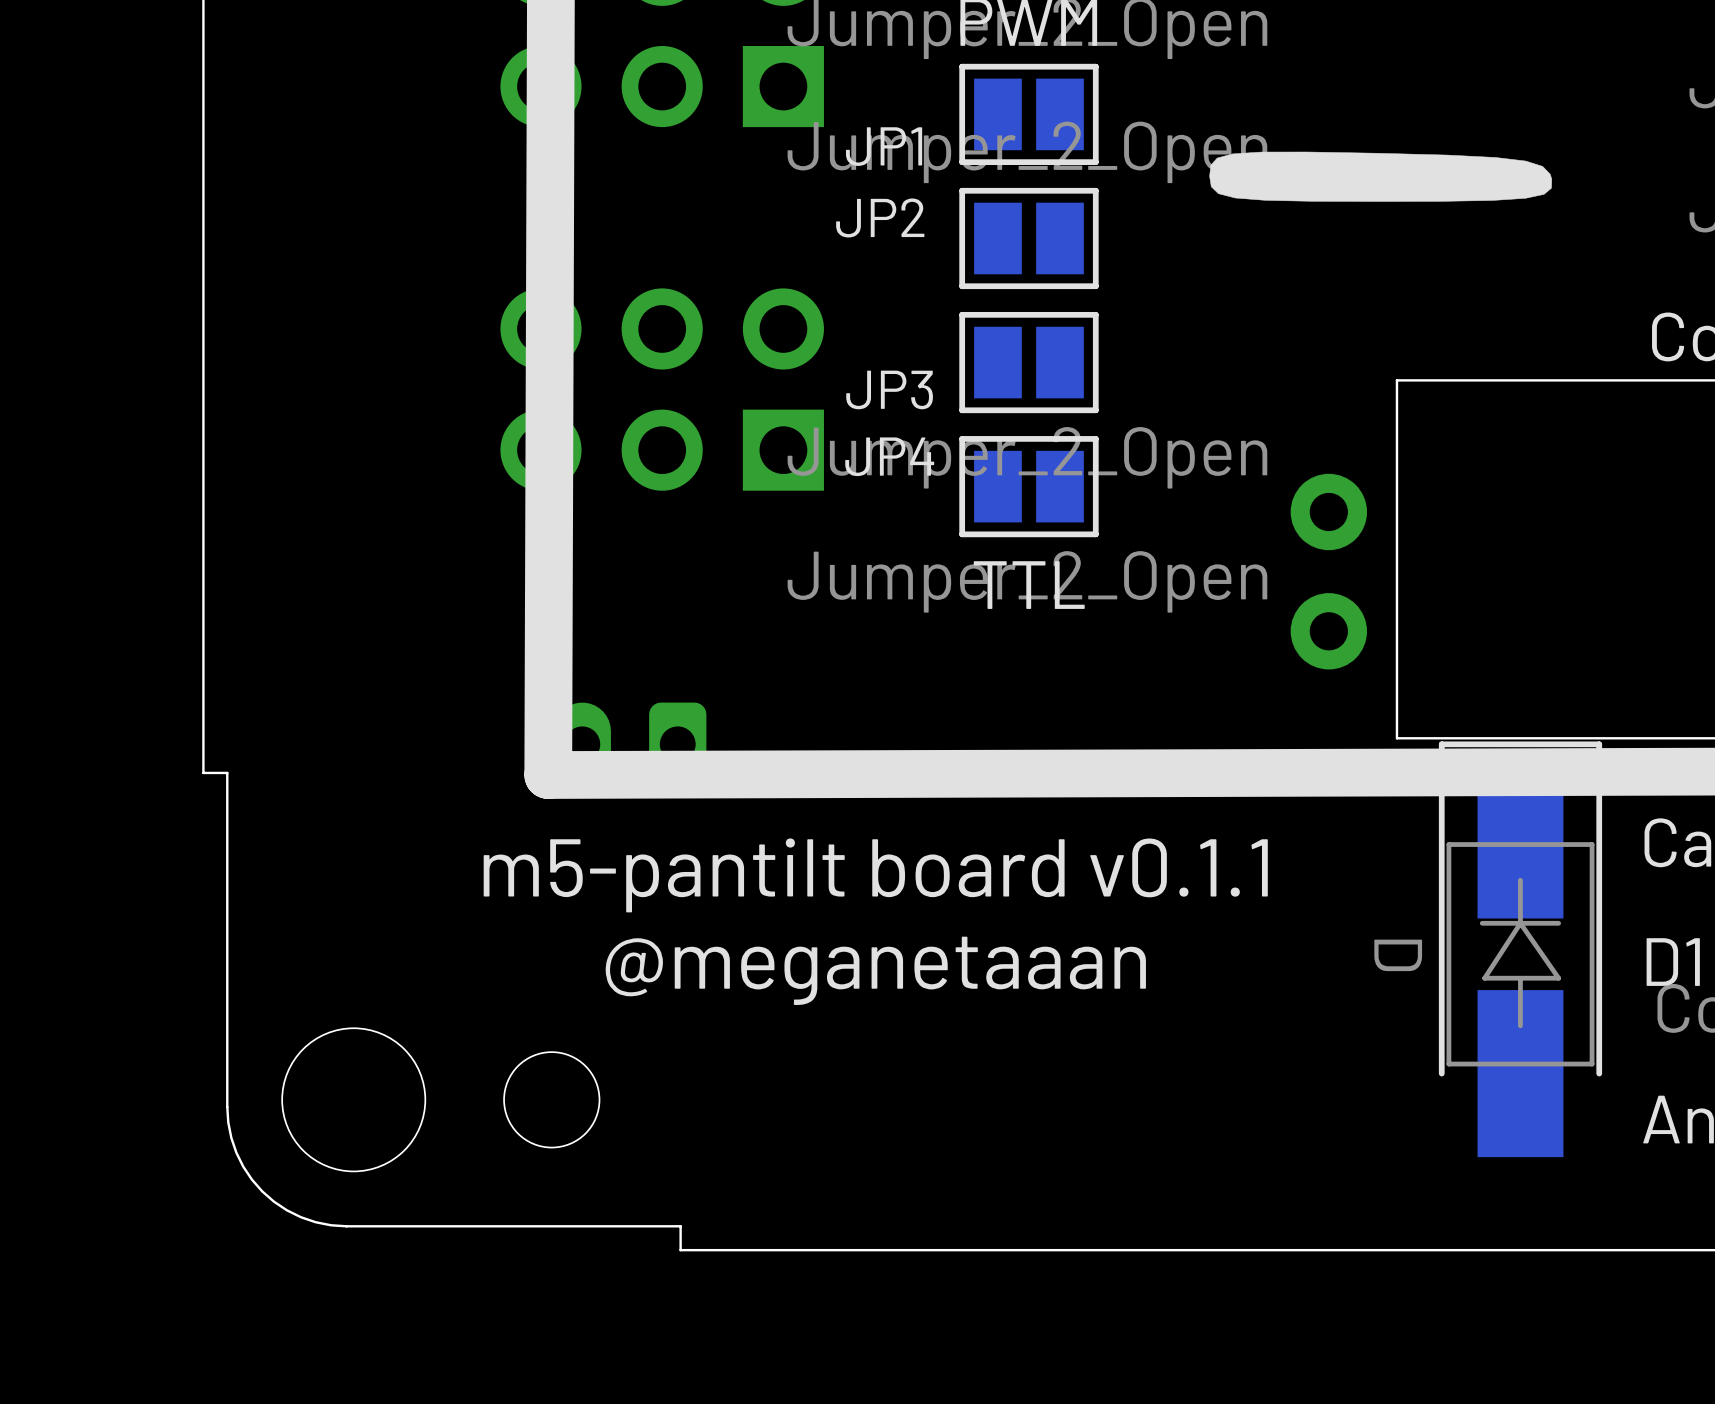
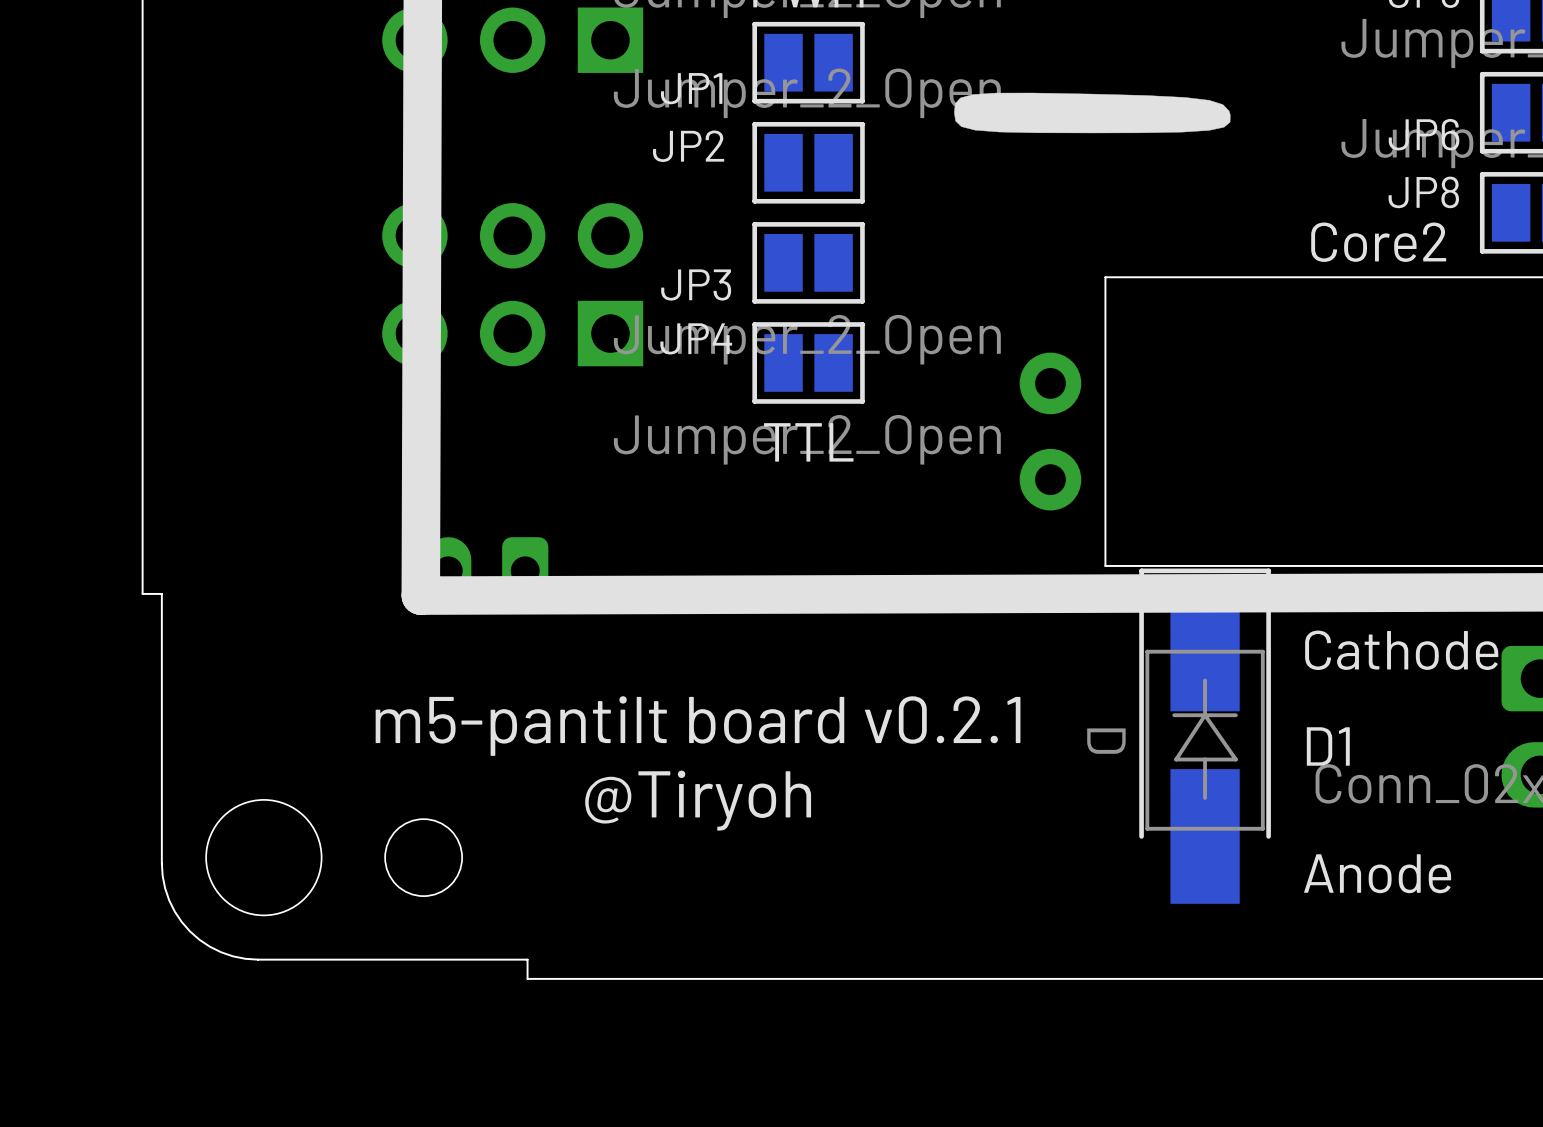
text: m5-pantilt board v0.1.1 (875, 875) -> m5-pantilt board v0.2.1 (698, 726)
text: @meganetaaan (875, 970) -> none
text: none -> @Tiryoh (698, 800)

